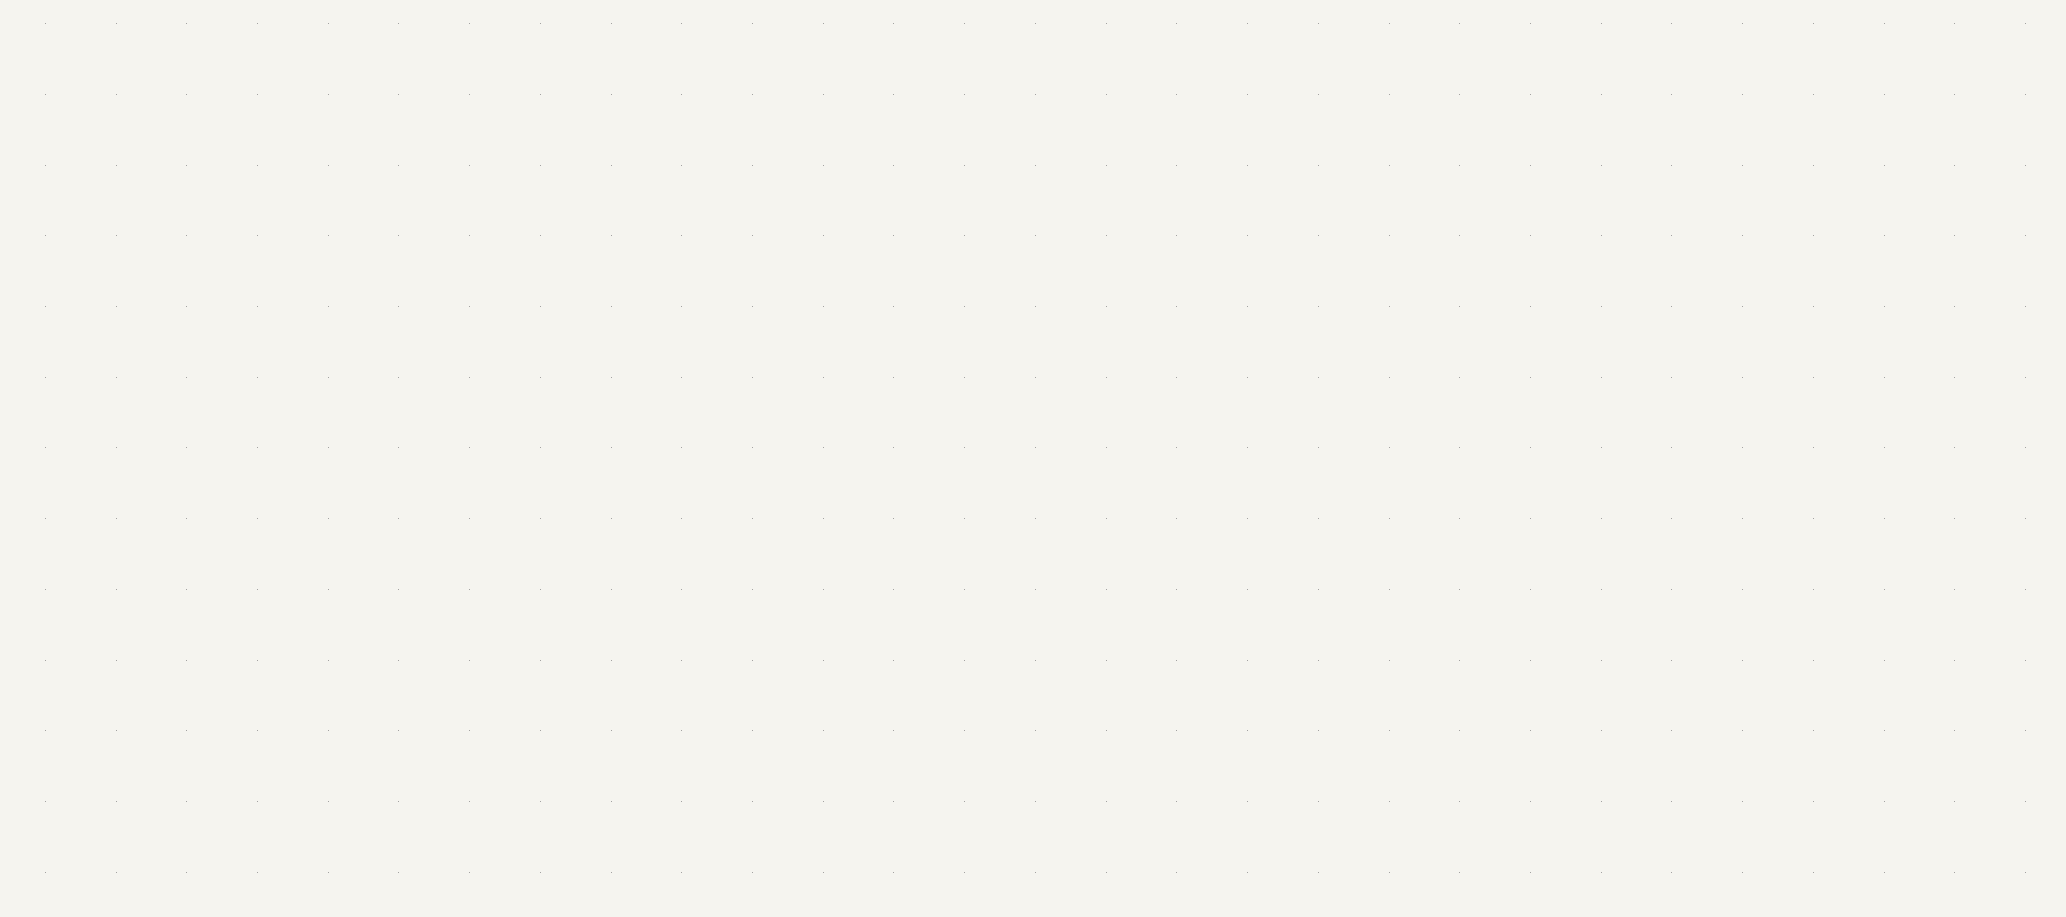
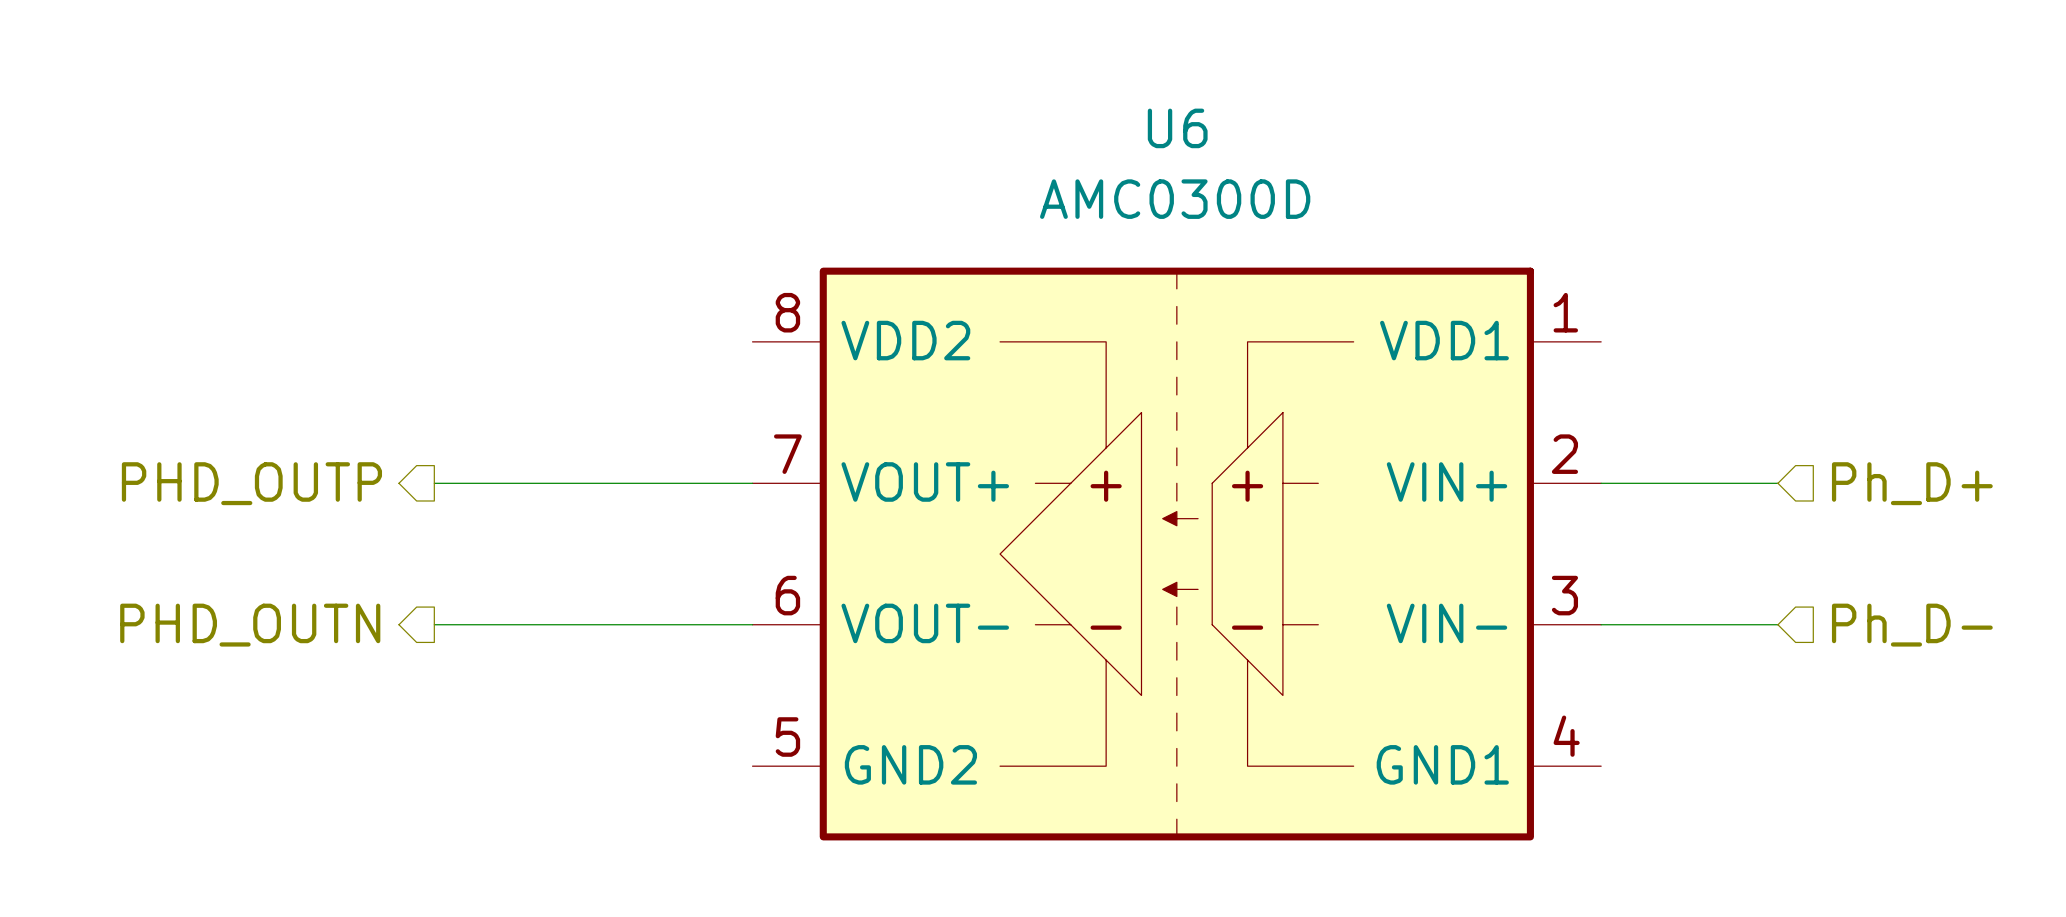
wire: none -> (434, 483) (752, 483)
wire: none -> (1601, 483) (1777, 483)
hierarchical label: none -> Ph_D+ (1912, 483)
hierarchical label: none -> PHD_OUTP (251, 483)
U6: none -> AMC0300D (1176, 554)
wire: none -> (434, 624) (752, 624)
wire: none -> (1601, 624) (1777, 624)
hierarchical label: none -> PHD_OUTN (250, 625)
hierarchical label: none -> Ph_D- (1912, 625)

